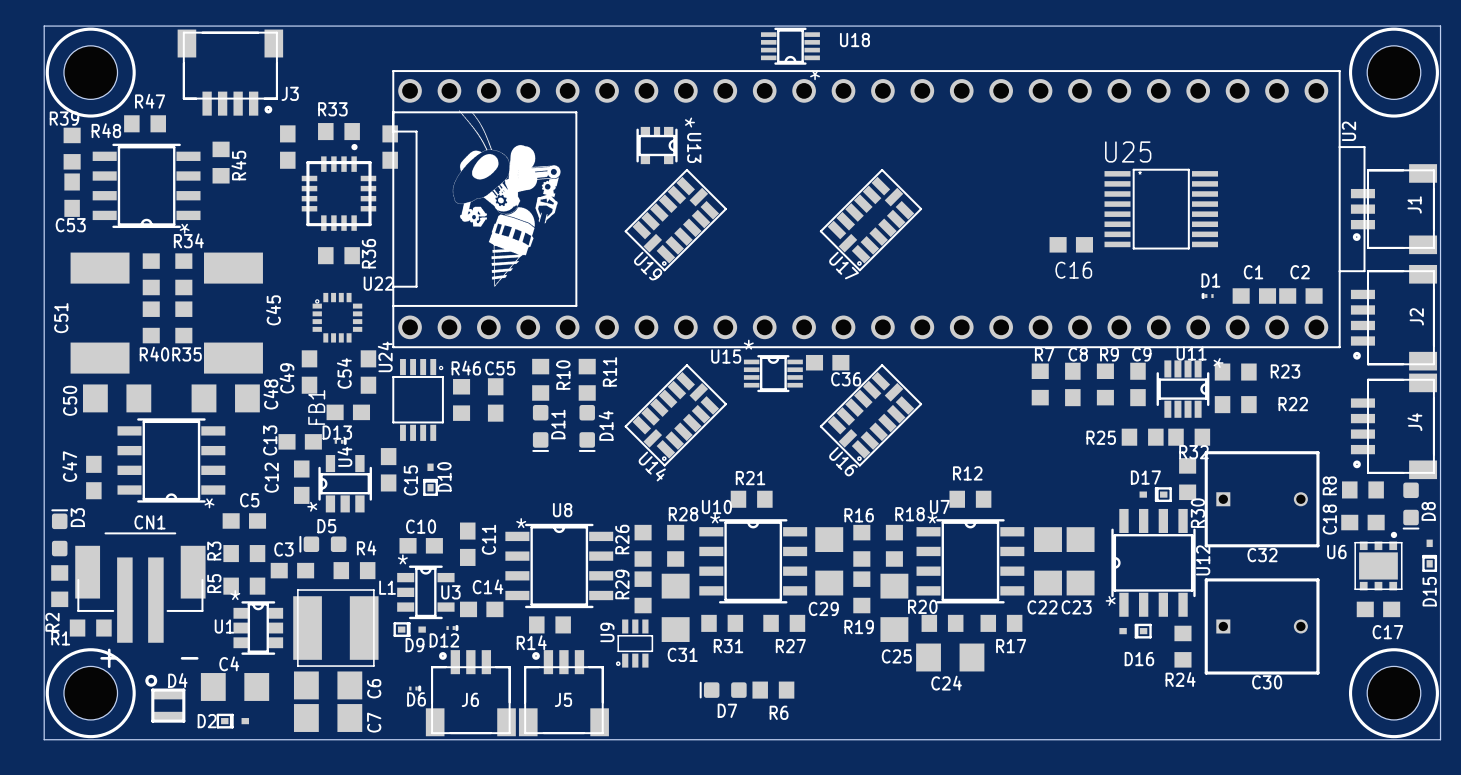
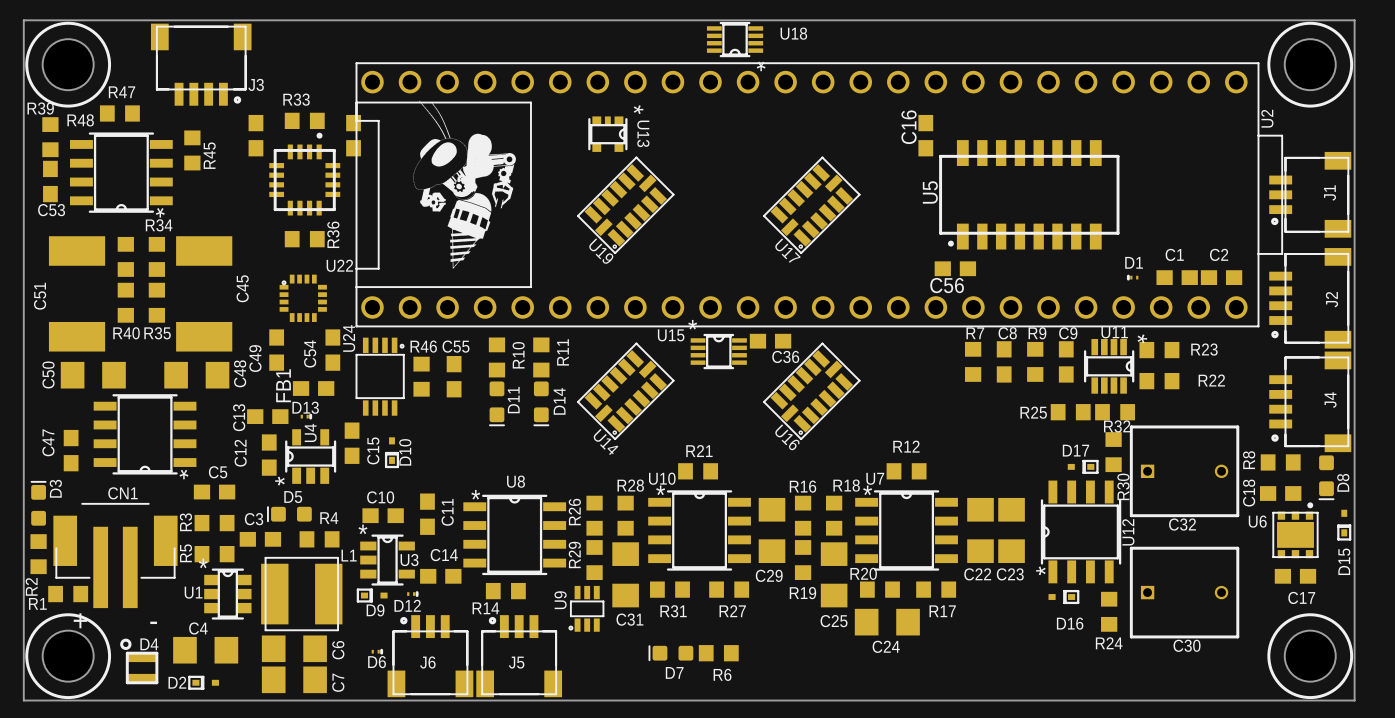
U5: none -> (1029, 194)
U25: (1161, 209) -> none
C16 rotation: 0° (1071, 244) -> 90° clockwise (925, 135)
C16 position: (1071, 244) -> (925, 135)
C56: none -> (955, 268)

